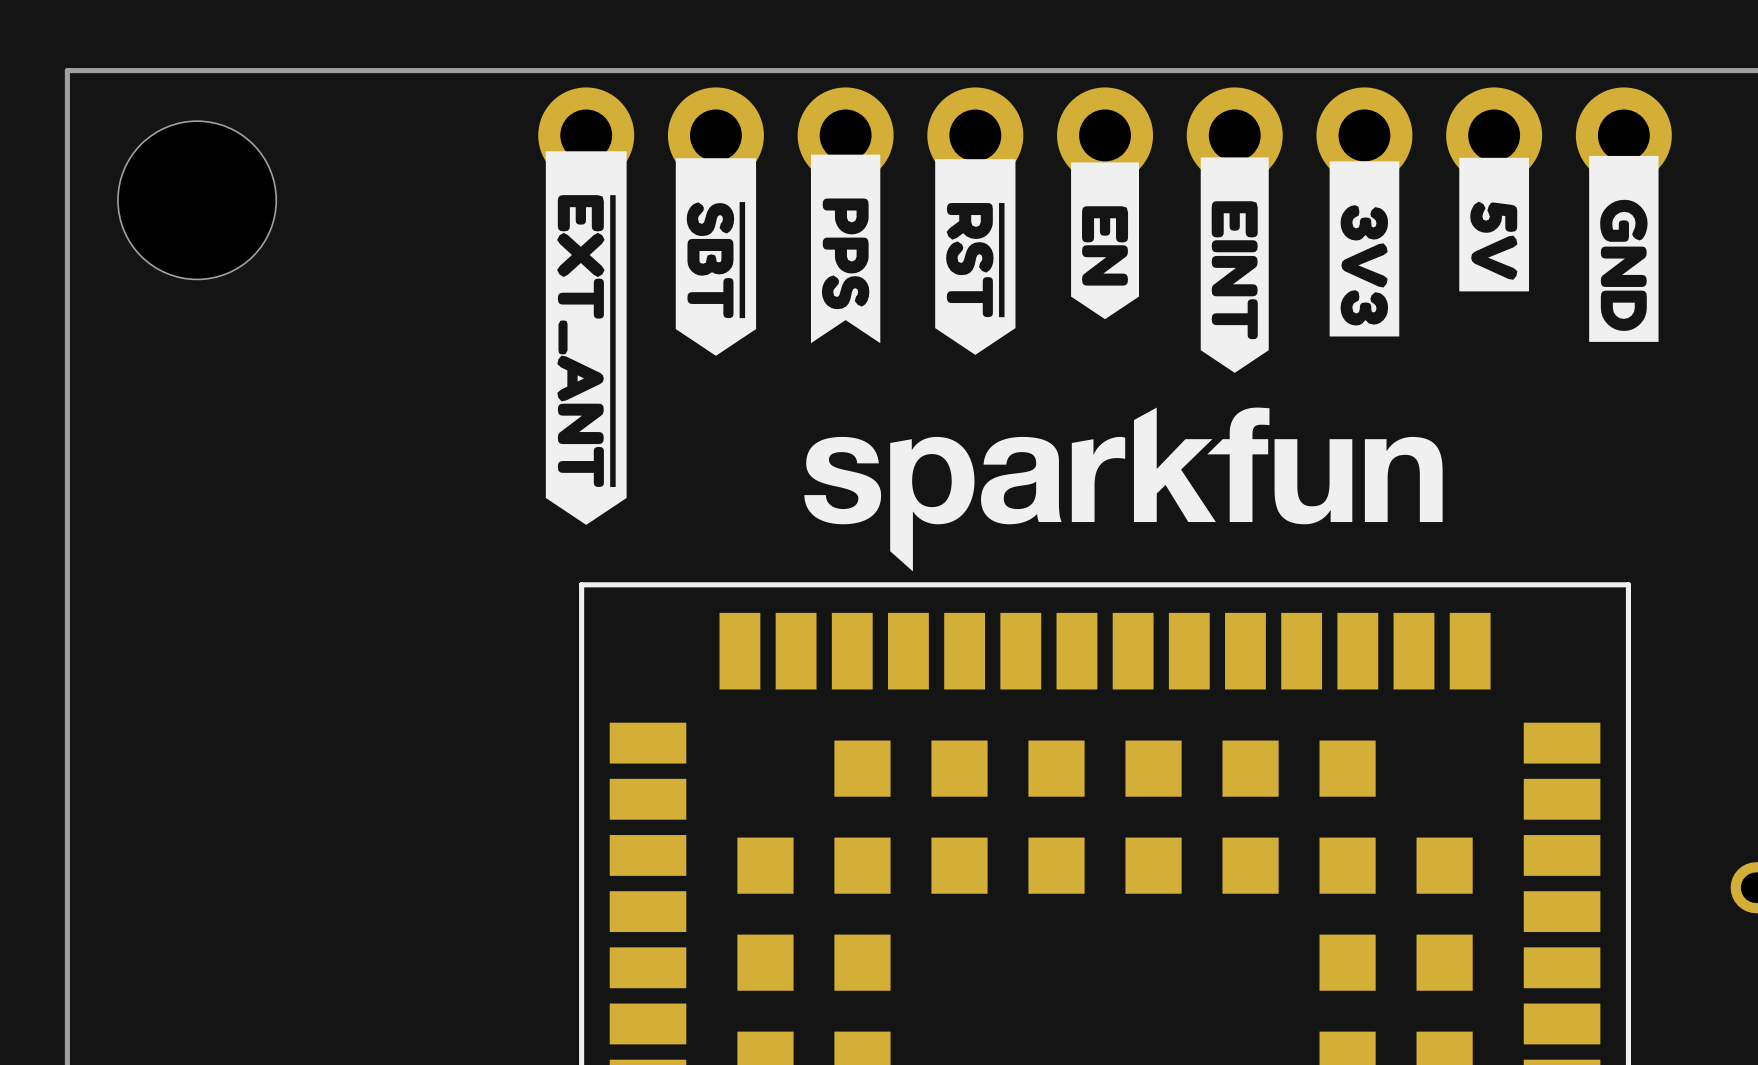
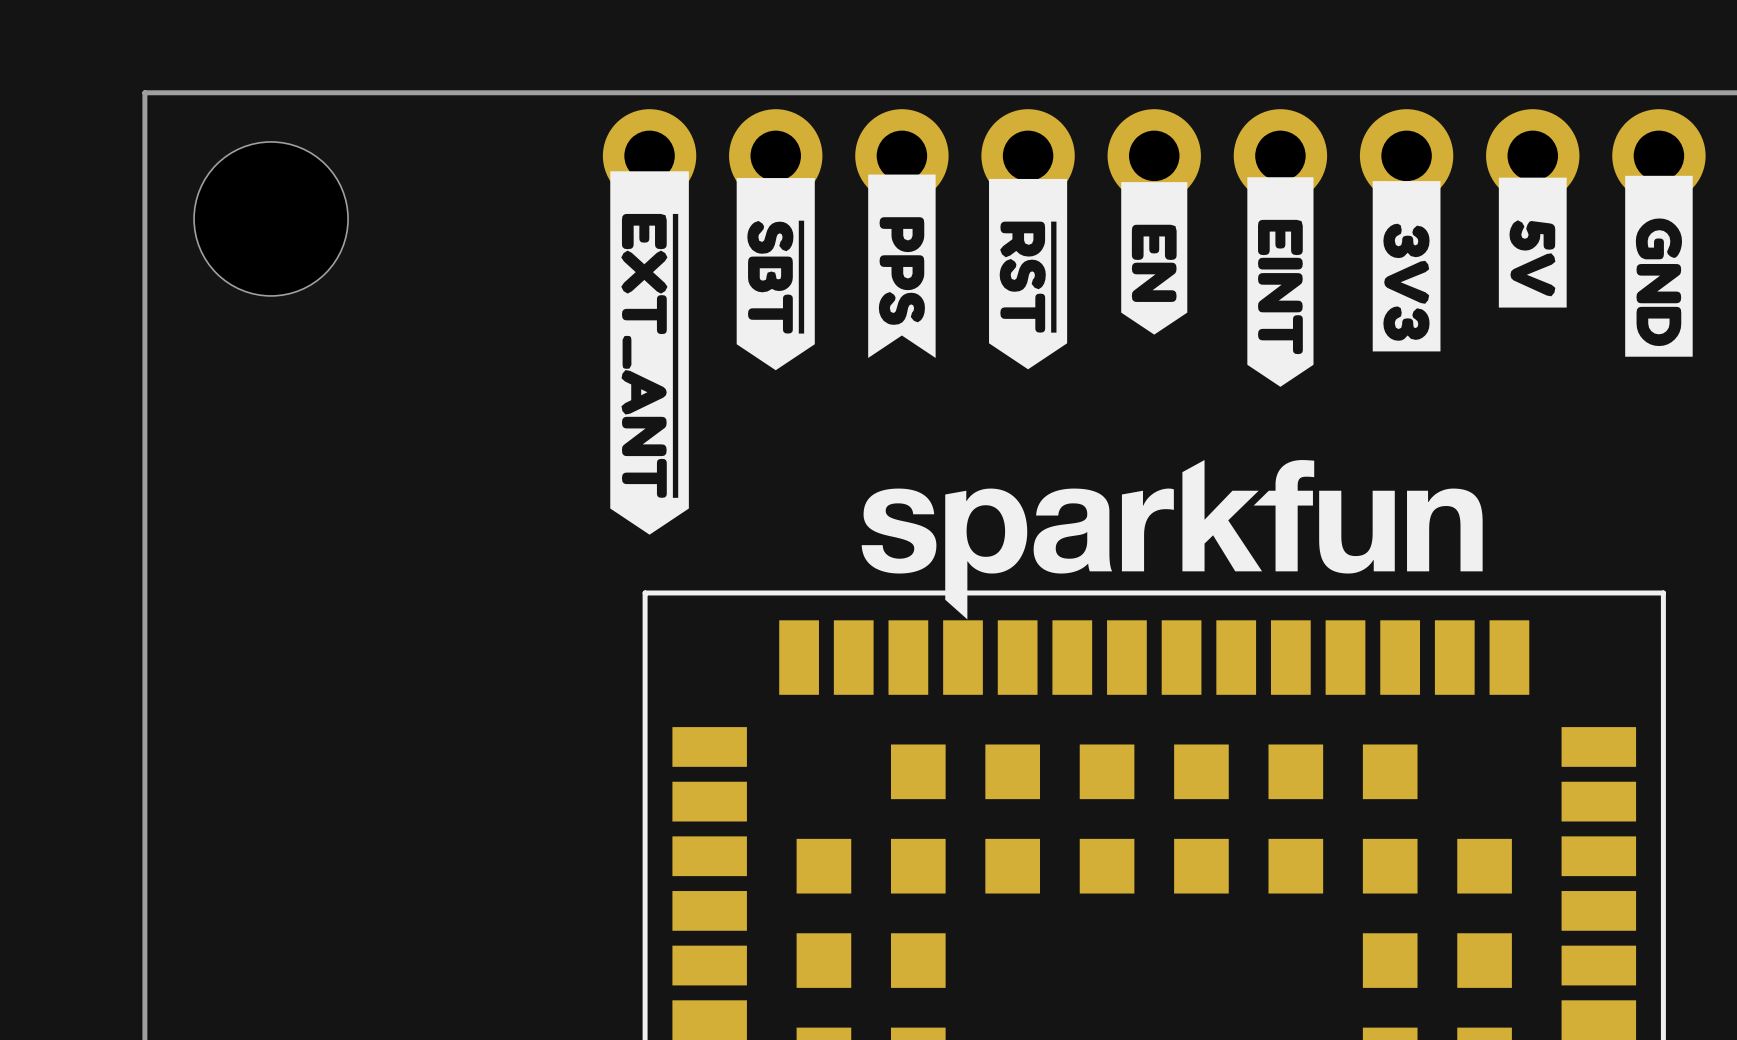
drawing position: (1123, 489) -> (1172, 539)

